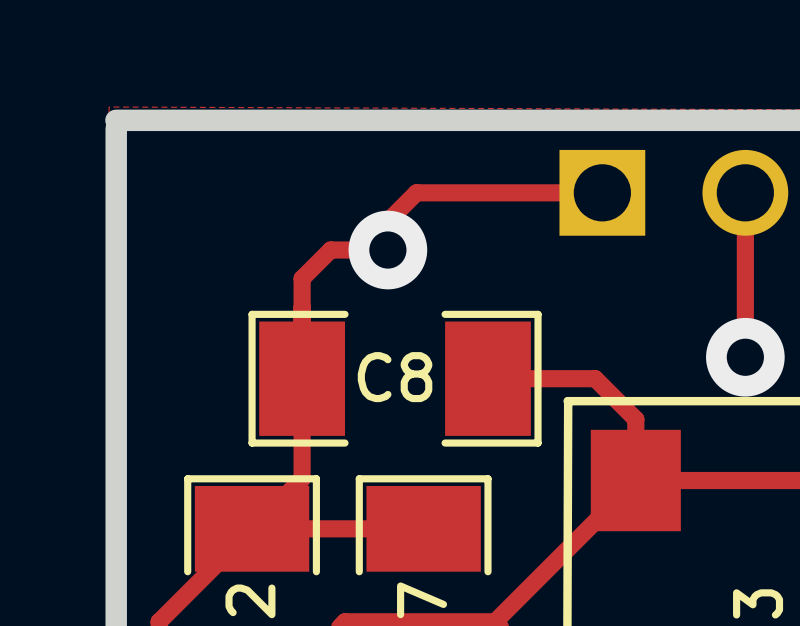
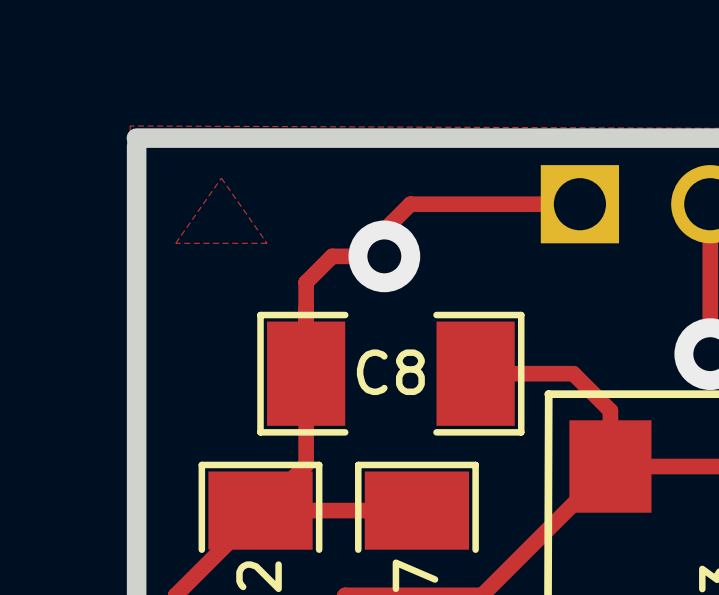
zone outline: none -> (221, 178) (267, 243) (175, 243) (221, 178)

